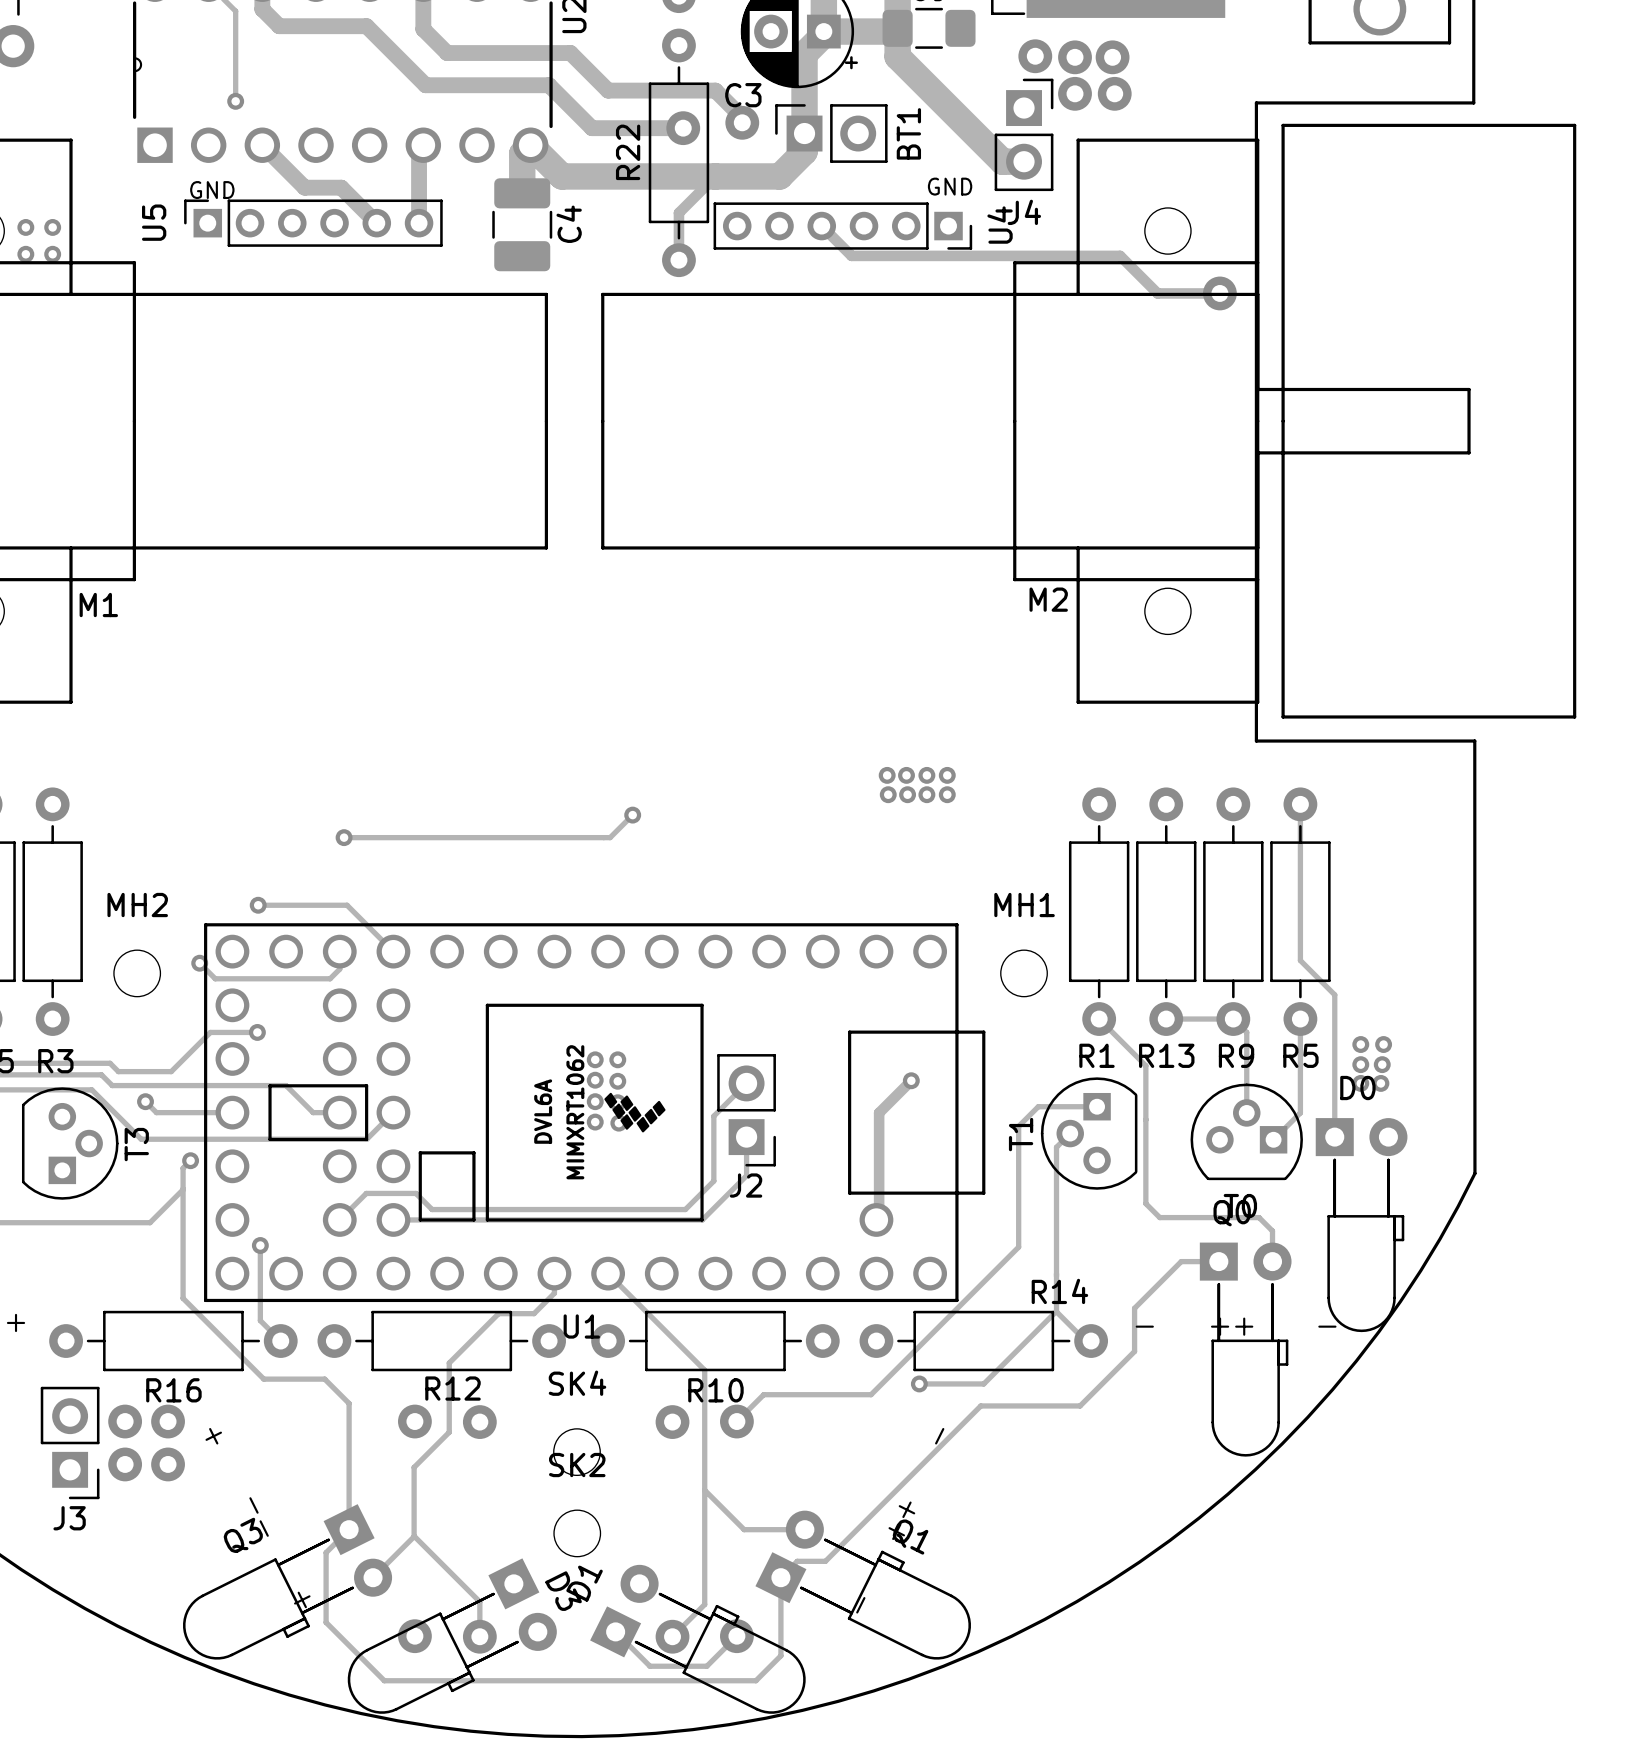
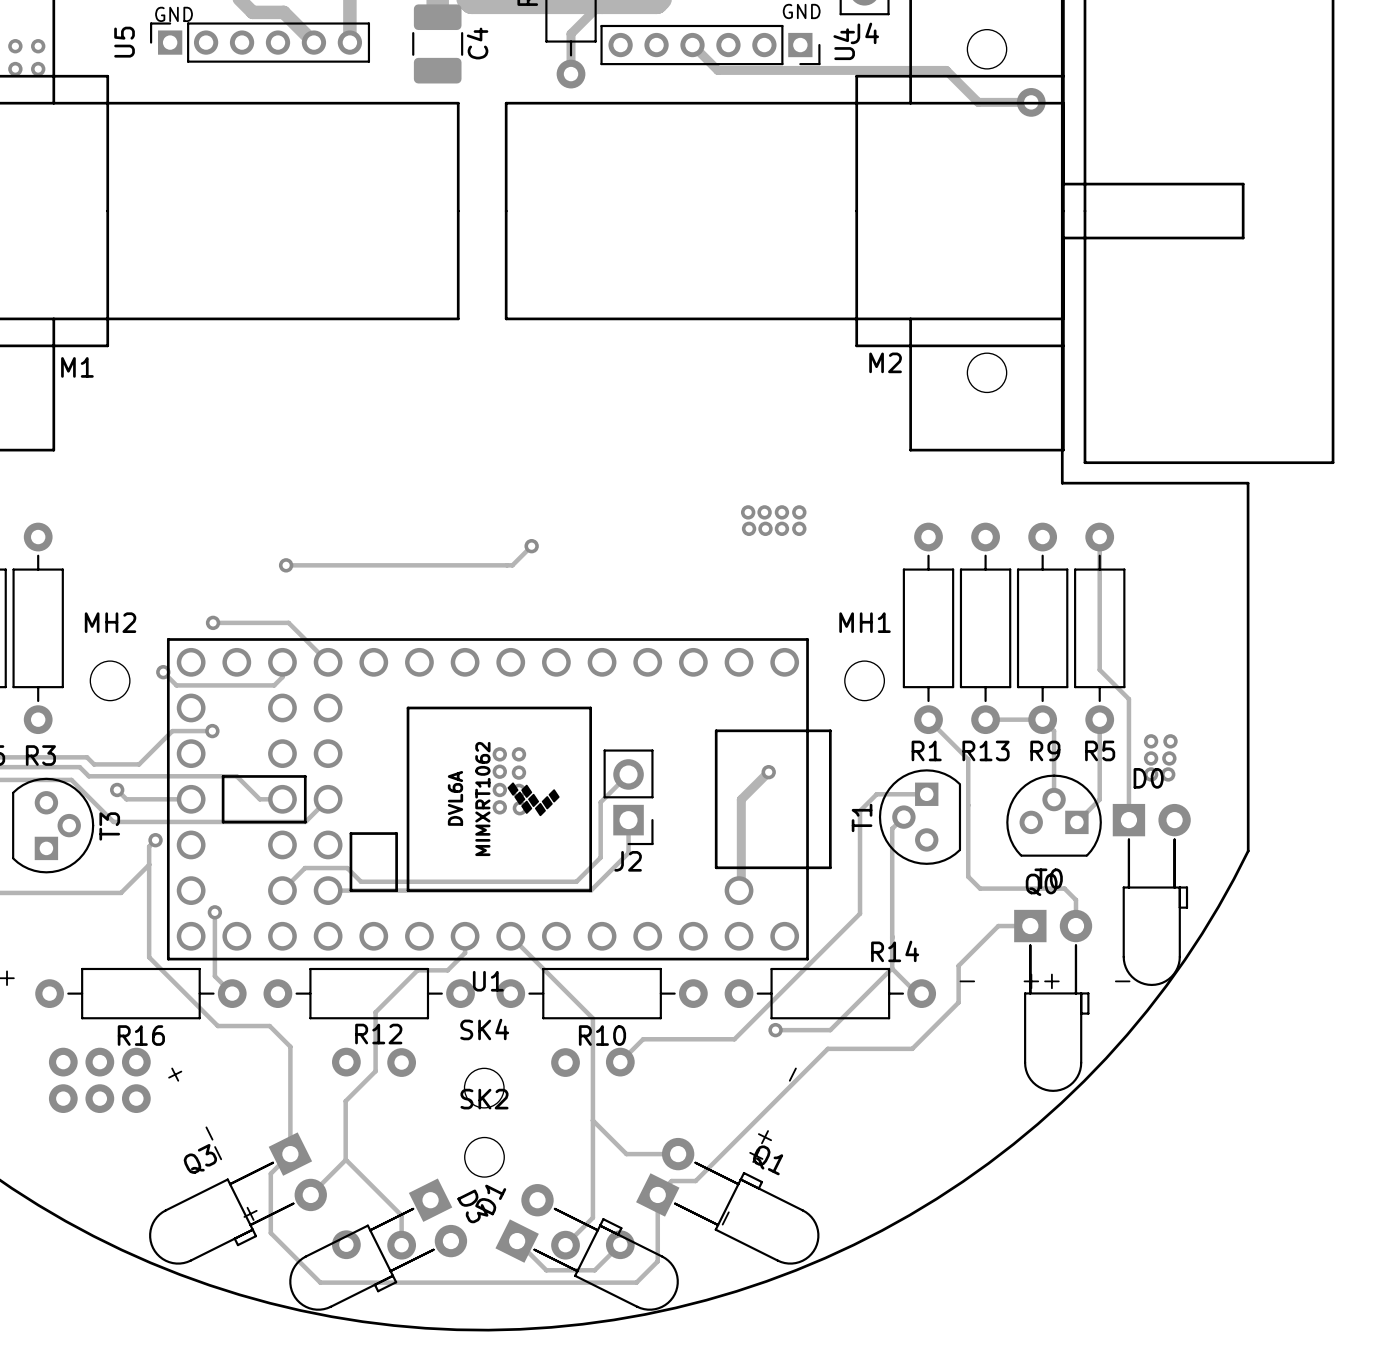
via: none -> (63, 1062)
J3: (70, 1442) -> none
via: none -> (63, 1098)

